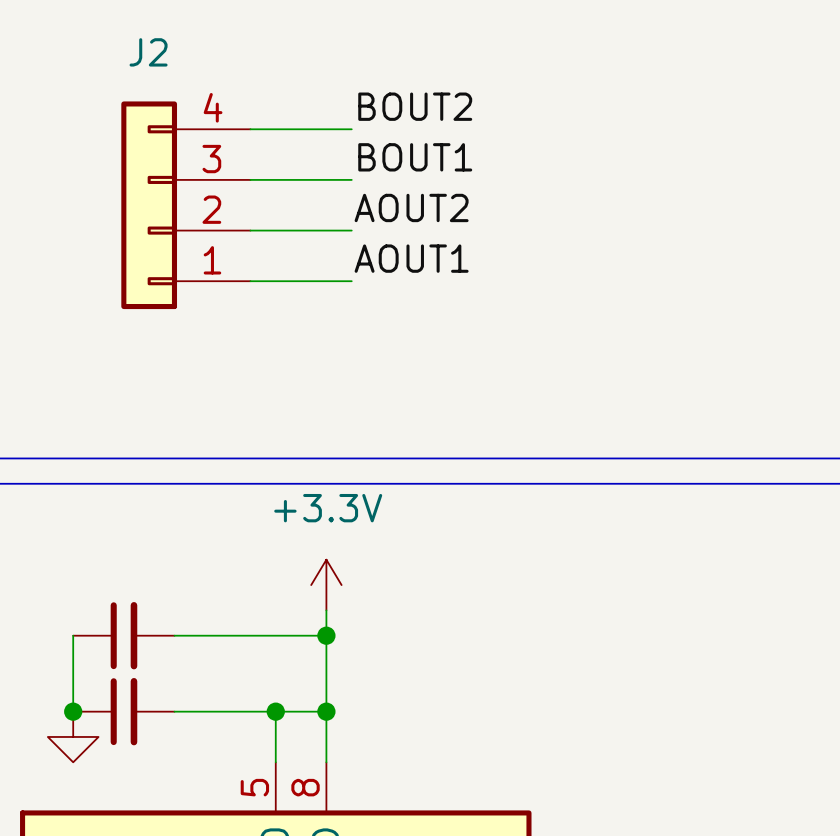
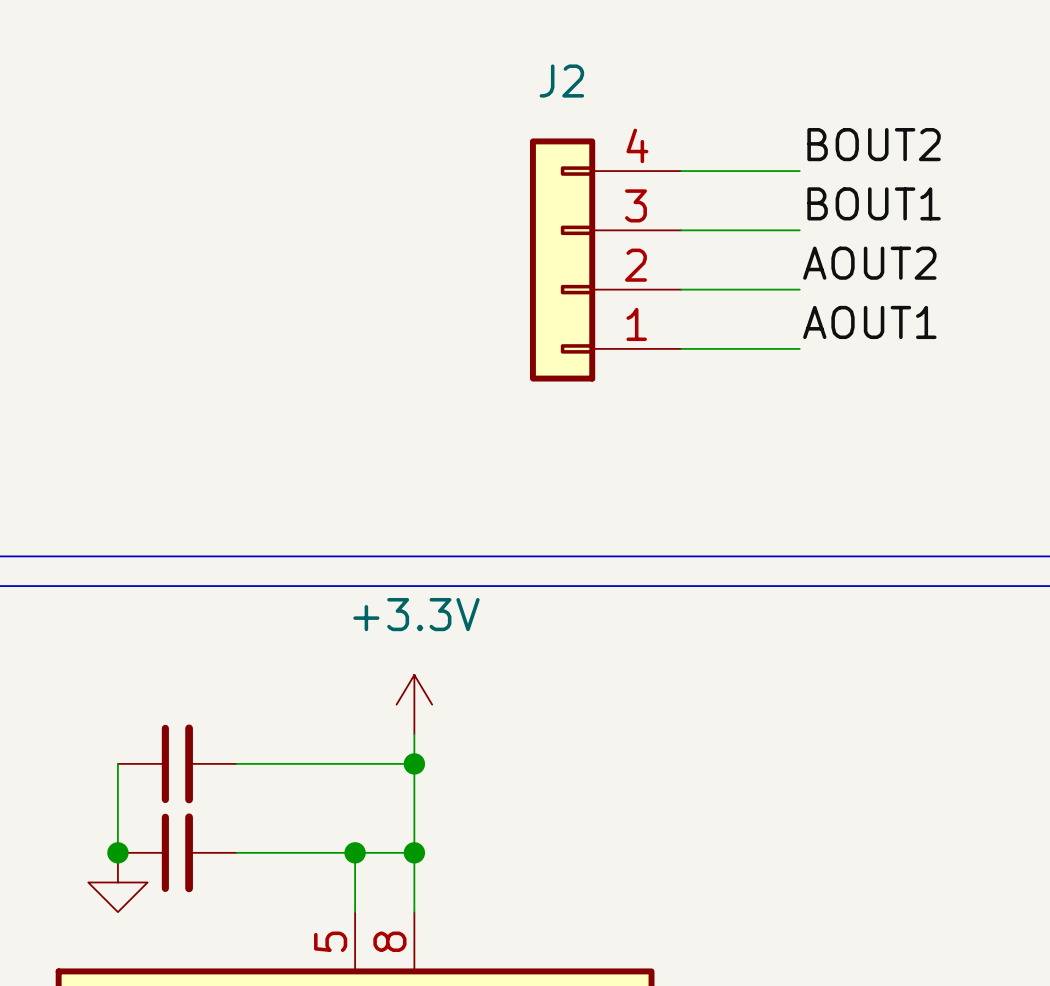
label position: BOUT2 (415, 106) -> BOUT2 (874, 144)
wire: (250, 129) (351, 129) -> (681, 171) (799, 171)
label position: BOUT1 (415, 157) -> BOUT1 (874, 203)
wire: (250, 179) (351, 179) -> (681, 230) (799, 230)
J2 position: (185, 205) -> (605, 259)
label position: AOUT2 (411, 207) -> AOUT2 (869, 263)
wire: (250, 230) (351, 230) -> (681, 289) (799, 289)
label position: AOUT1 (411, 258) -> AOUT1 (869, 322)
wire: (250, 281) (351, 281) -> (681, 348) (799, 348)

